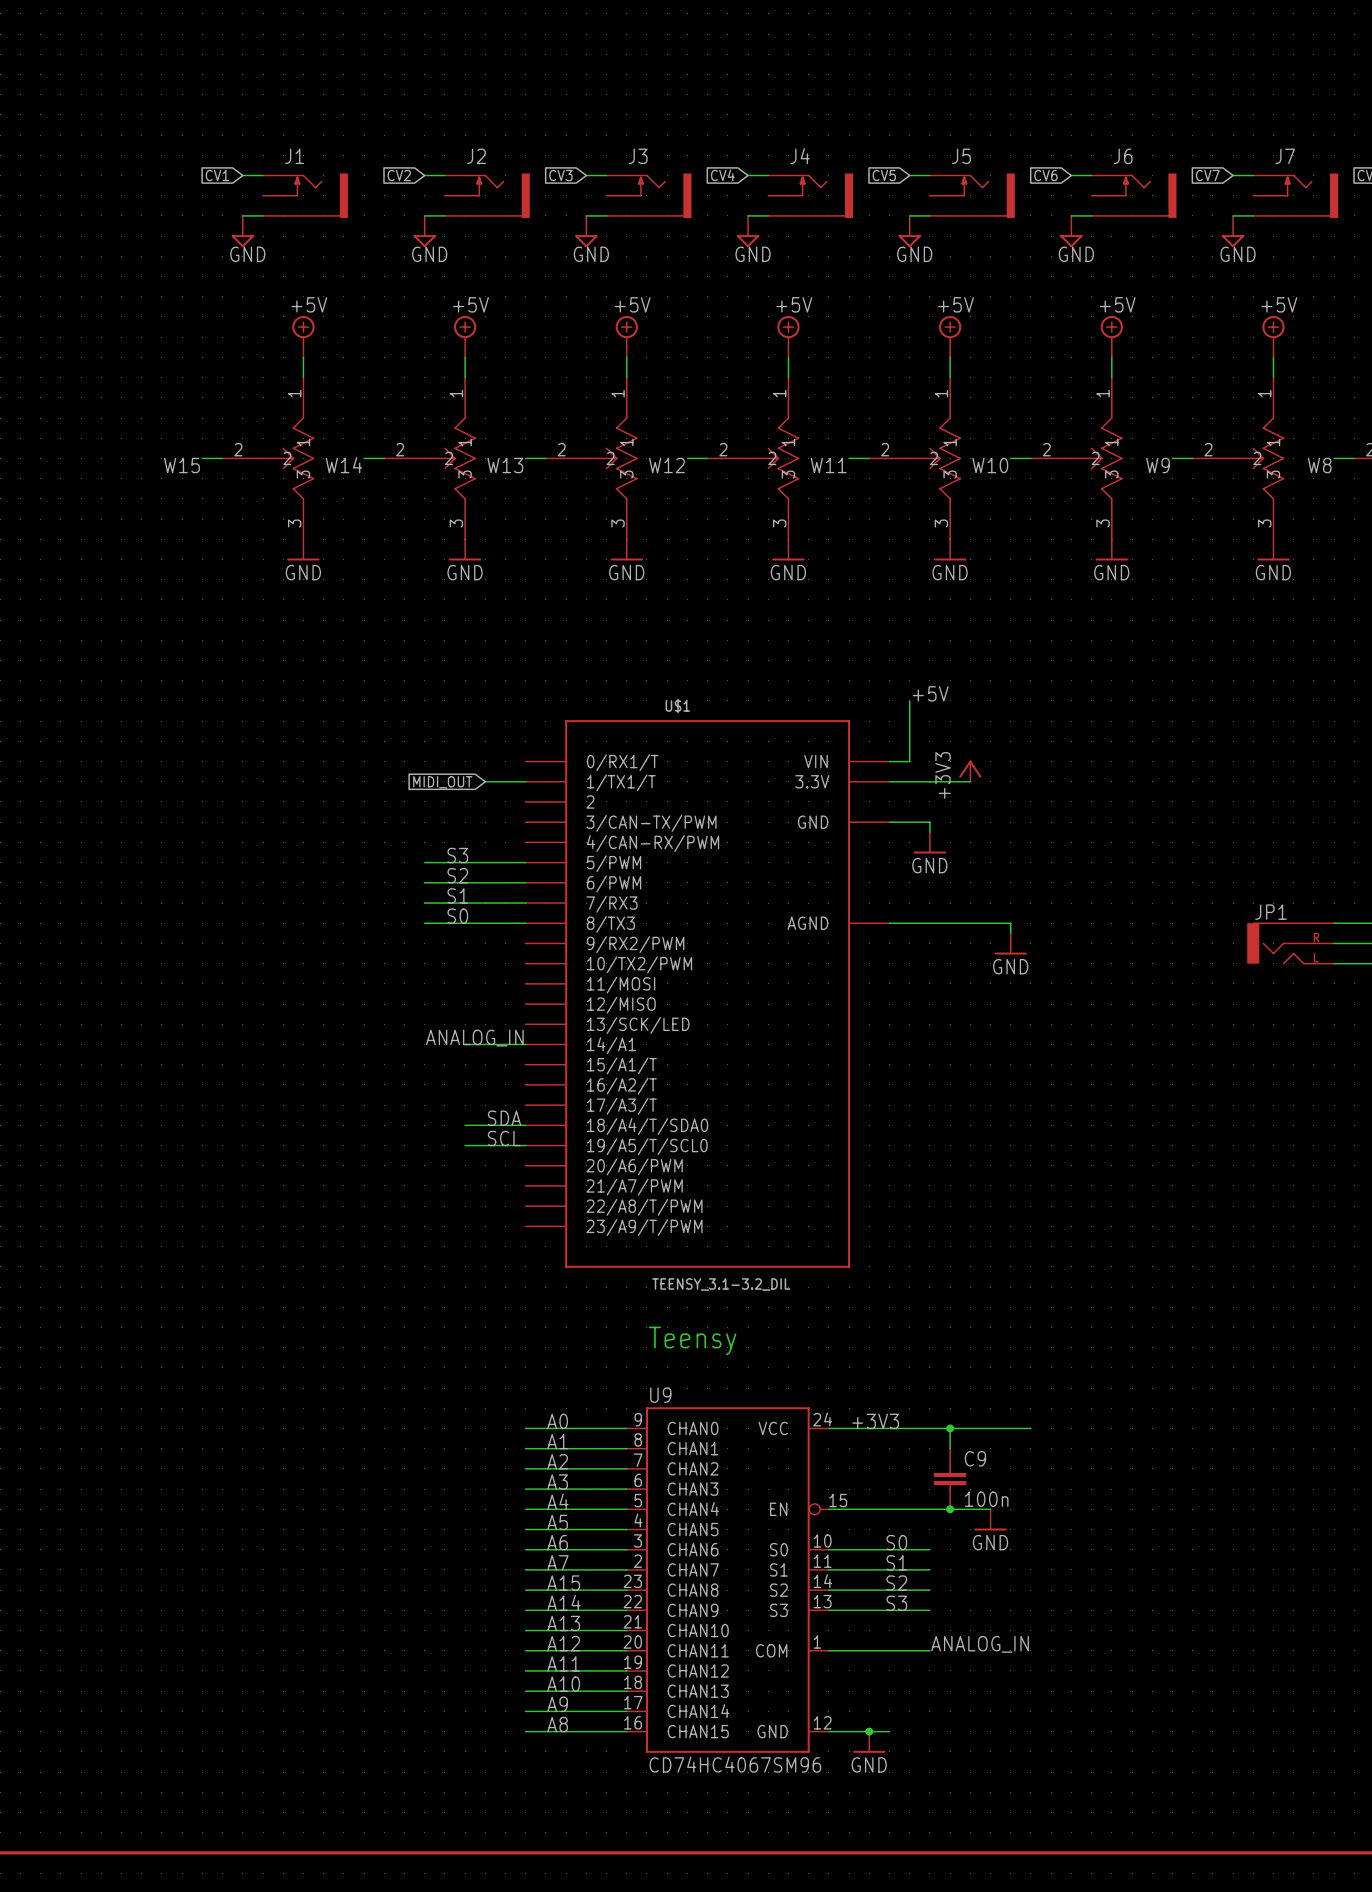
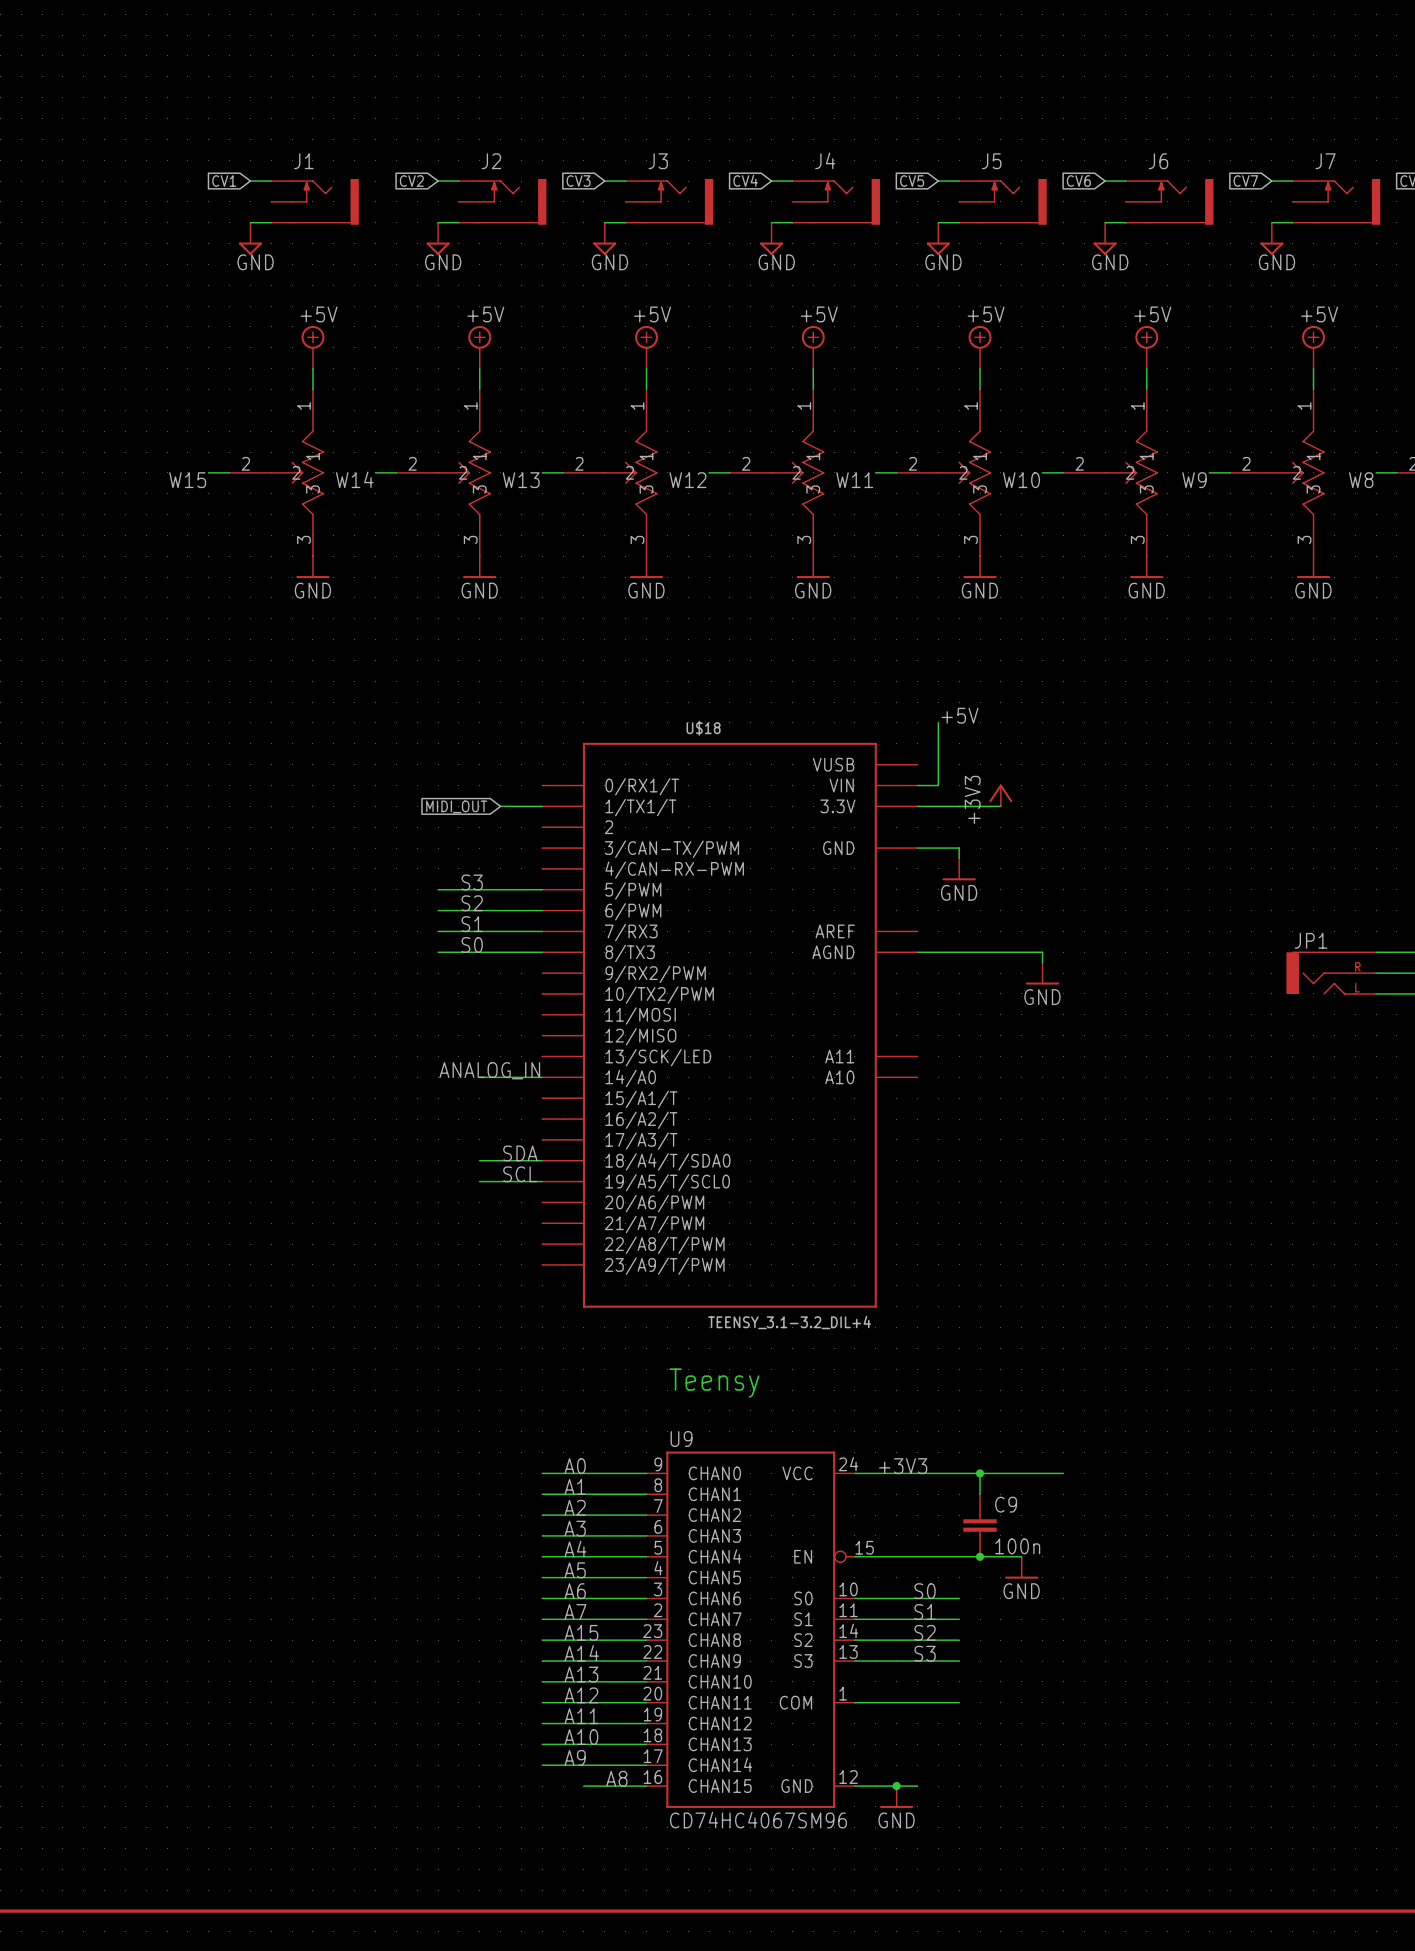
U$1: TEENSY_3.1-3.2_DIL (707, 993) -> none
U$18: none -> TEENSY_3.1-3.2_DIL+4 (729, 1025)
label: ANALOG_IN (980, 1644) -> none
label position: A8 (557, 1724) -> A8 (616, 1778)
wire: (525, 1731) (566, 1731) -> none

